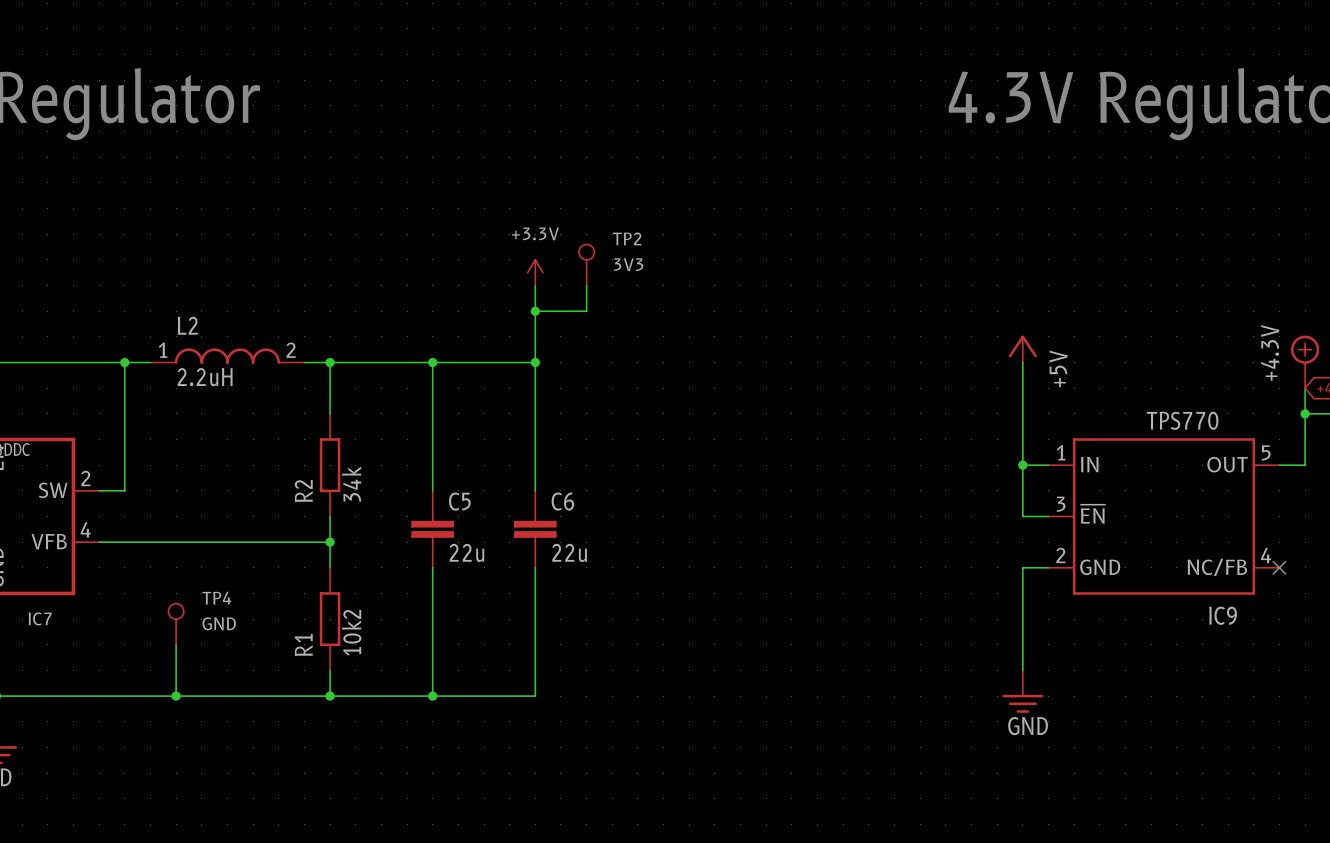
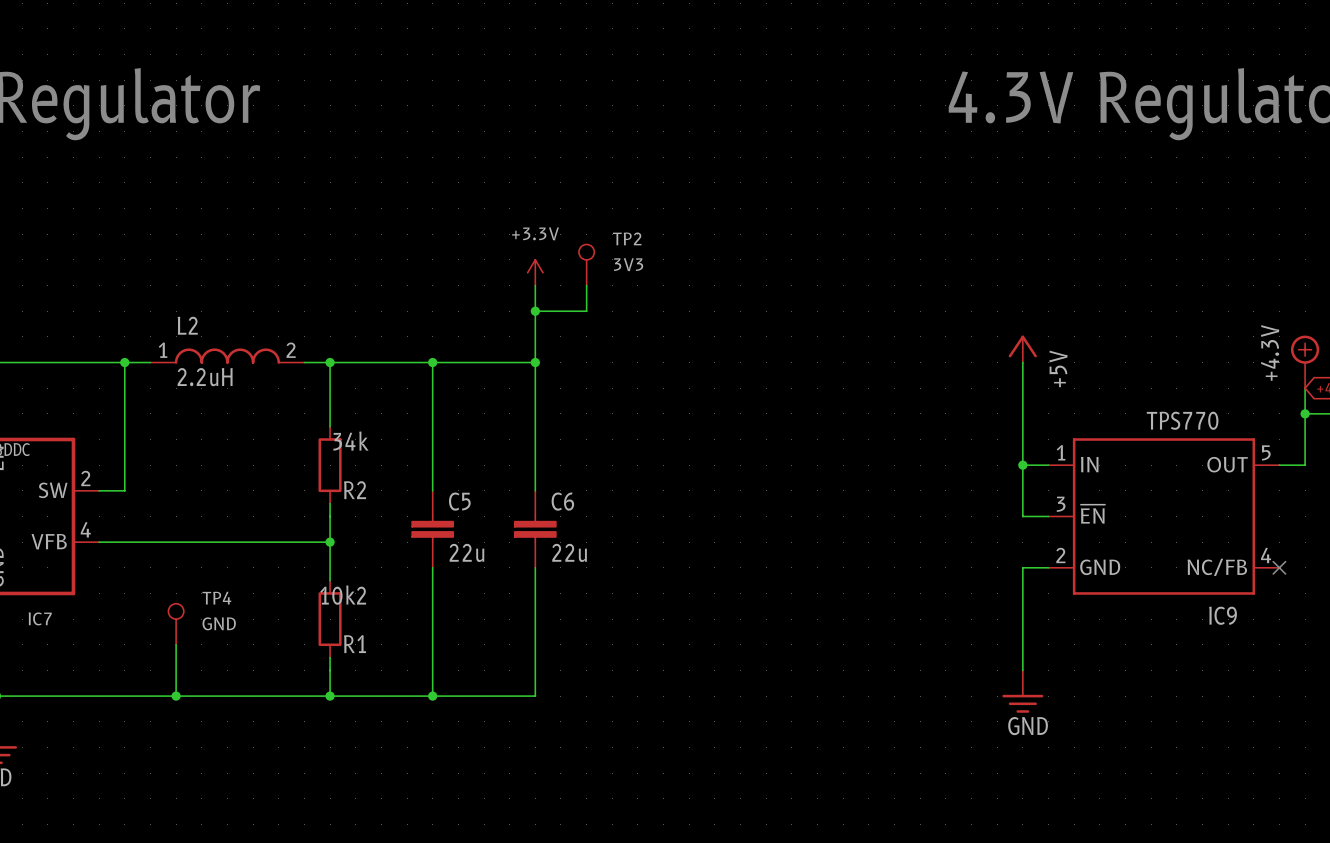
R2 symbol: [319, 413, 341, 517] -> [318, 426, 342, 504]
R2 value position: 34k (351, 484) -> 34k (350, 441)
R2 name position: R2 (303, 491) -> R2 (355, 490)
R1 symbol: [319, 567, 341, 671] -> [318, 580, 342, 658]
R1 value position: 10k2 (351, 632) -> 10k2 (343, 595)
R1 name position: R1 (303, 645) -> R1 (355, 644)

